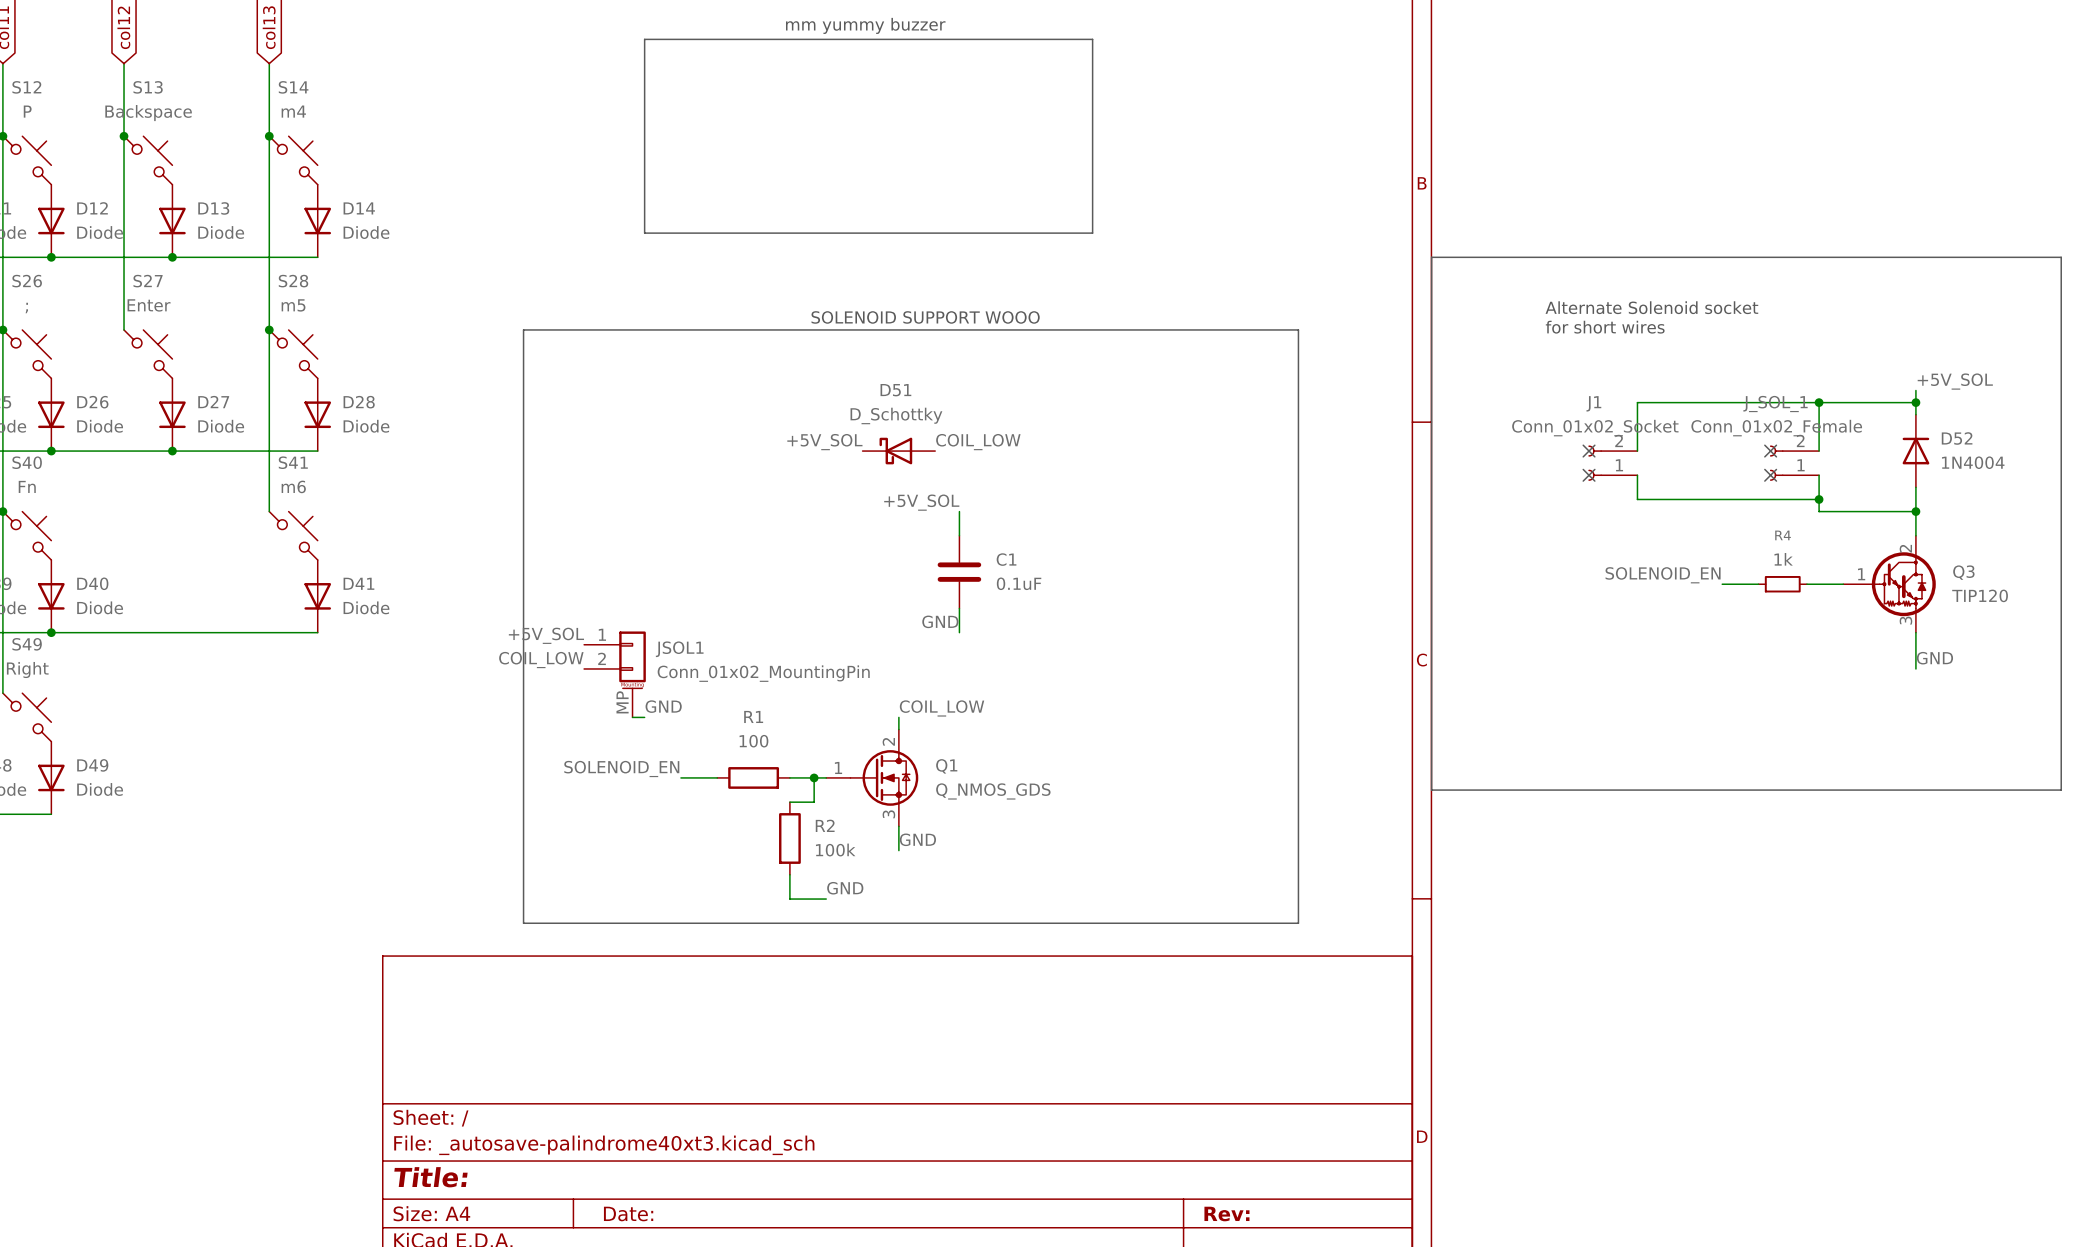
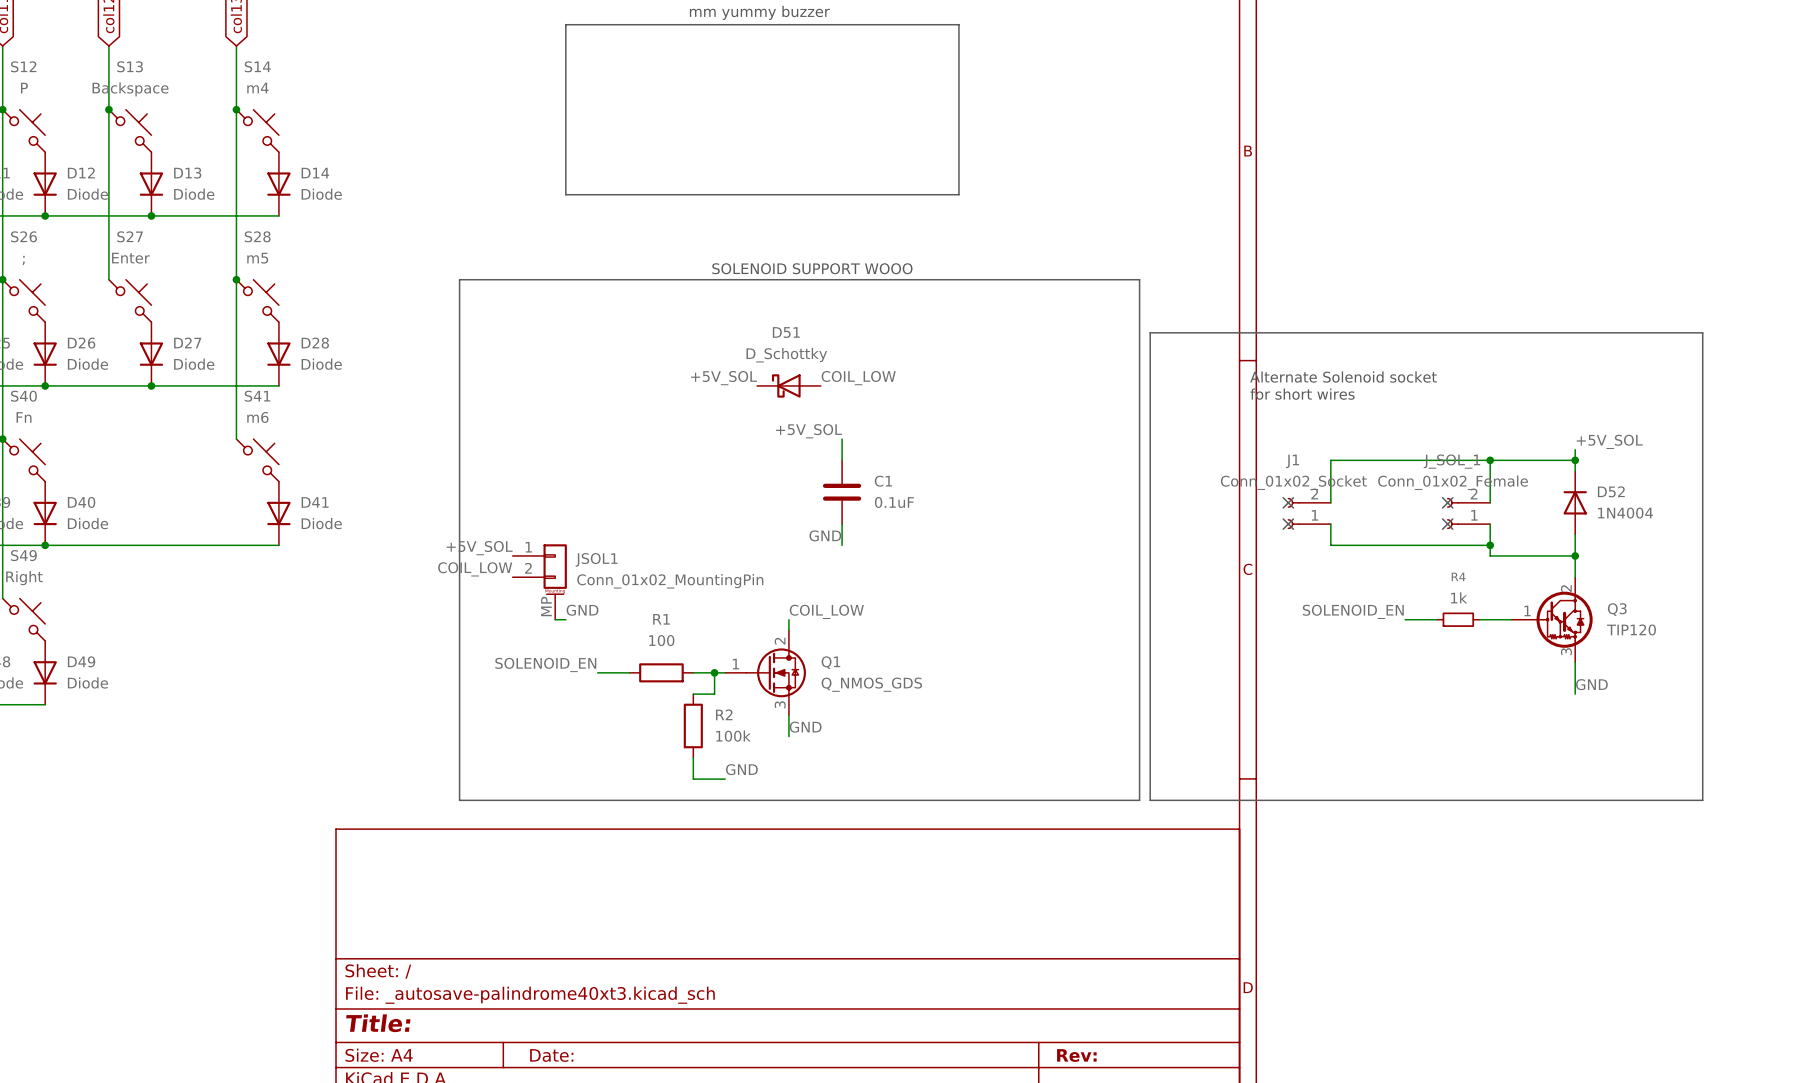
line: (1431, 257) (2061, 257) (2061, 790) (1431, 790) (1431, 257) -> (1150, 332) (1702, 332) (1702, 800) (1150, 800) (1150, 332)
text position: Alternate Solenoid socket (1651, 307) -> Alternate Solenoid socket (1343, 377)
text position: for short wires (1605, 327) -> for short wires (1302, 394)
label position: +5V_SOL (1955, 381) -> +5V_SOL (1609, 441)
wire: (1915, 390) (1915, 414) -> (1575, 449) (1575, 470)
wire: (1819, 402) (1819, 451) -> (1490, 460) (1490, 502)
junction: (1819, 402) -> none
wire: (1915, 402) (1637, 402) (1637, 451) -> (1575, 460) (1330, 460) (1330, 502)
junction: (1915, 402) -> none
no-connect mark: (1589, 451) -> none
no-connect mark: (1770, 451) -> none
D52 position: (1915, 451) -> (1575, 502)
J1 position: (1612, 463) -> (1309, 513)
J_SOL_1 position: (1794, 463) -> (1468, 513)
no-connect mark: (1589, 475) -> none
wire: (1637, 475) (1637, 499) (1819, 499) -> (1330, 524) (1330, 545) (1490, 545)
no-connect mark: (1770, 475) -> none
wire: (1819, 475) (1819, 511) (1915, 511) -> (1490, 524) (1490, 555) (1575, 555)
wire: (1915, 487) (1915, 535) -> (1575, 534) (1575, 577)
junction position: (1819, 499) -> (1575, 460)
junction: (1915, 511) -> none
junction: none -> (1490, 460)
label position: SOLENOID_EN (1663, 575) -> SOLENOID_EN (1353, 611)
no-connect mark: none -> (1288, 502)
no-connect mark: none -> (1447, 502)
wire: (1722, 584) (1758, 584) -> (1405, 619) (1437, 619)
R4 position: (1782, 584) -> (1458, 619)
wire: (1806, 584) (1843, 584) -> (1479, 619) (1511, 619)
Q3 position: (1889, 584) -> (1552, 619)
no-connect mark: none -> (1288, 524)
no-connect mark: none -> (1447, 524)
junction: none -> (1490, 545)
wire: (1915, 632) (1915, 668) -> (1575, 662) (1575, 694)
junction: none -> (1575, 555)
label position: GND (1934, 658) -> GND (1591, 684)

